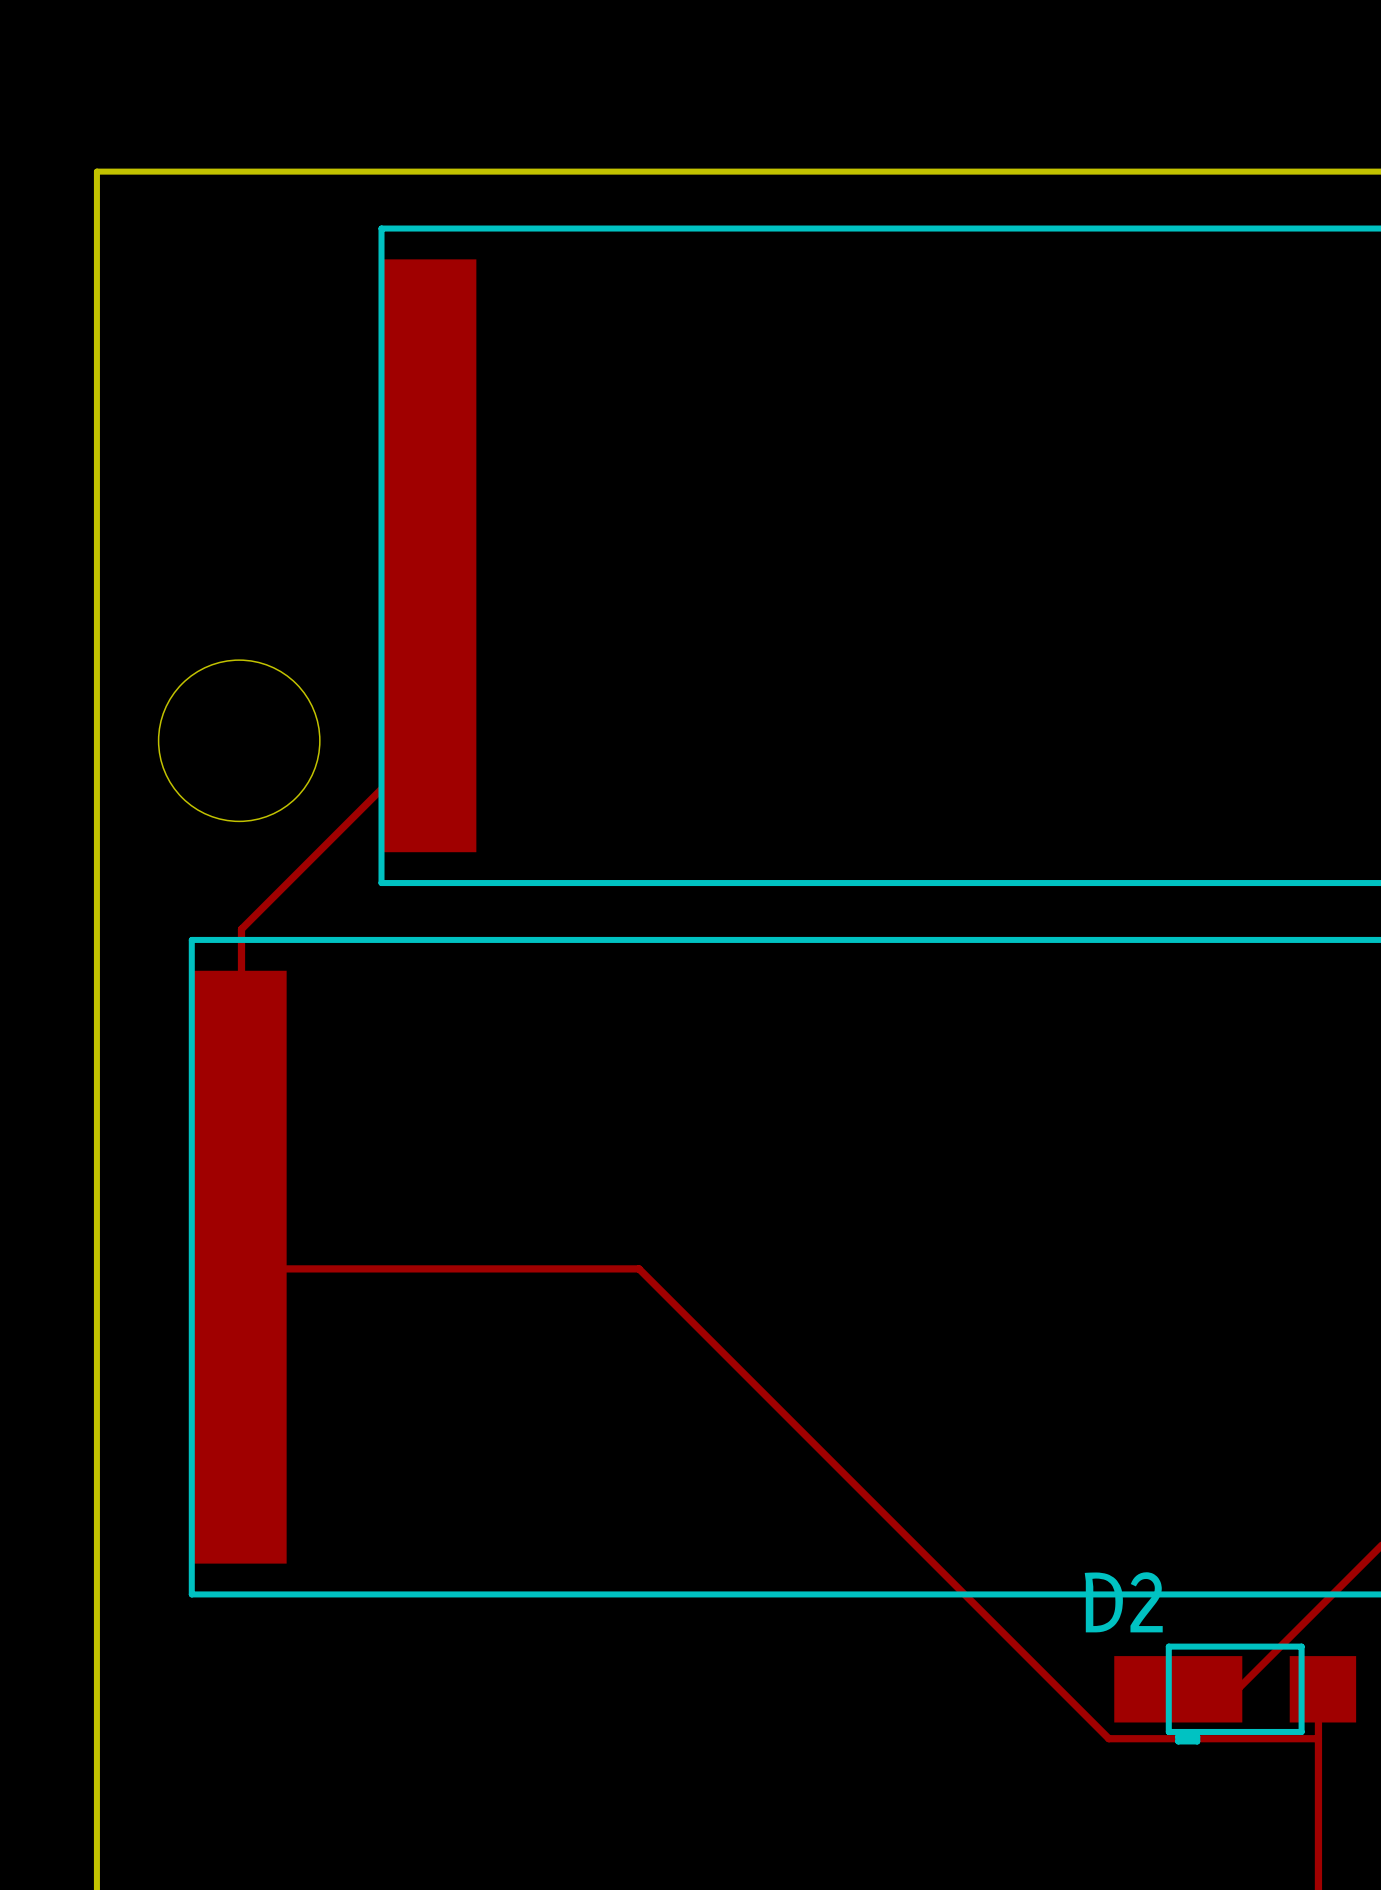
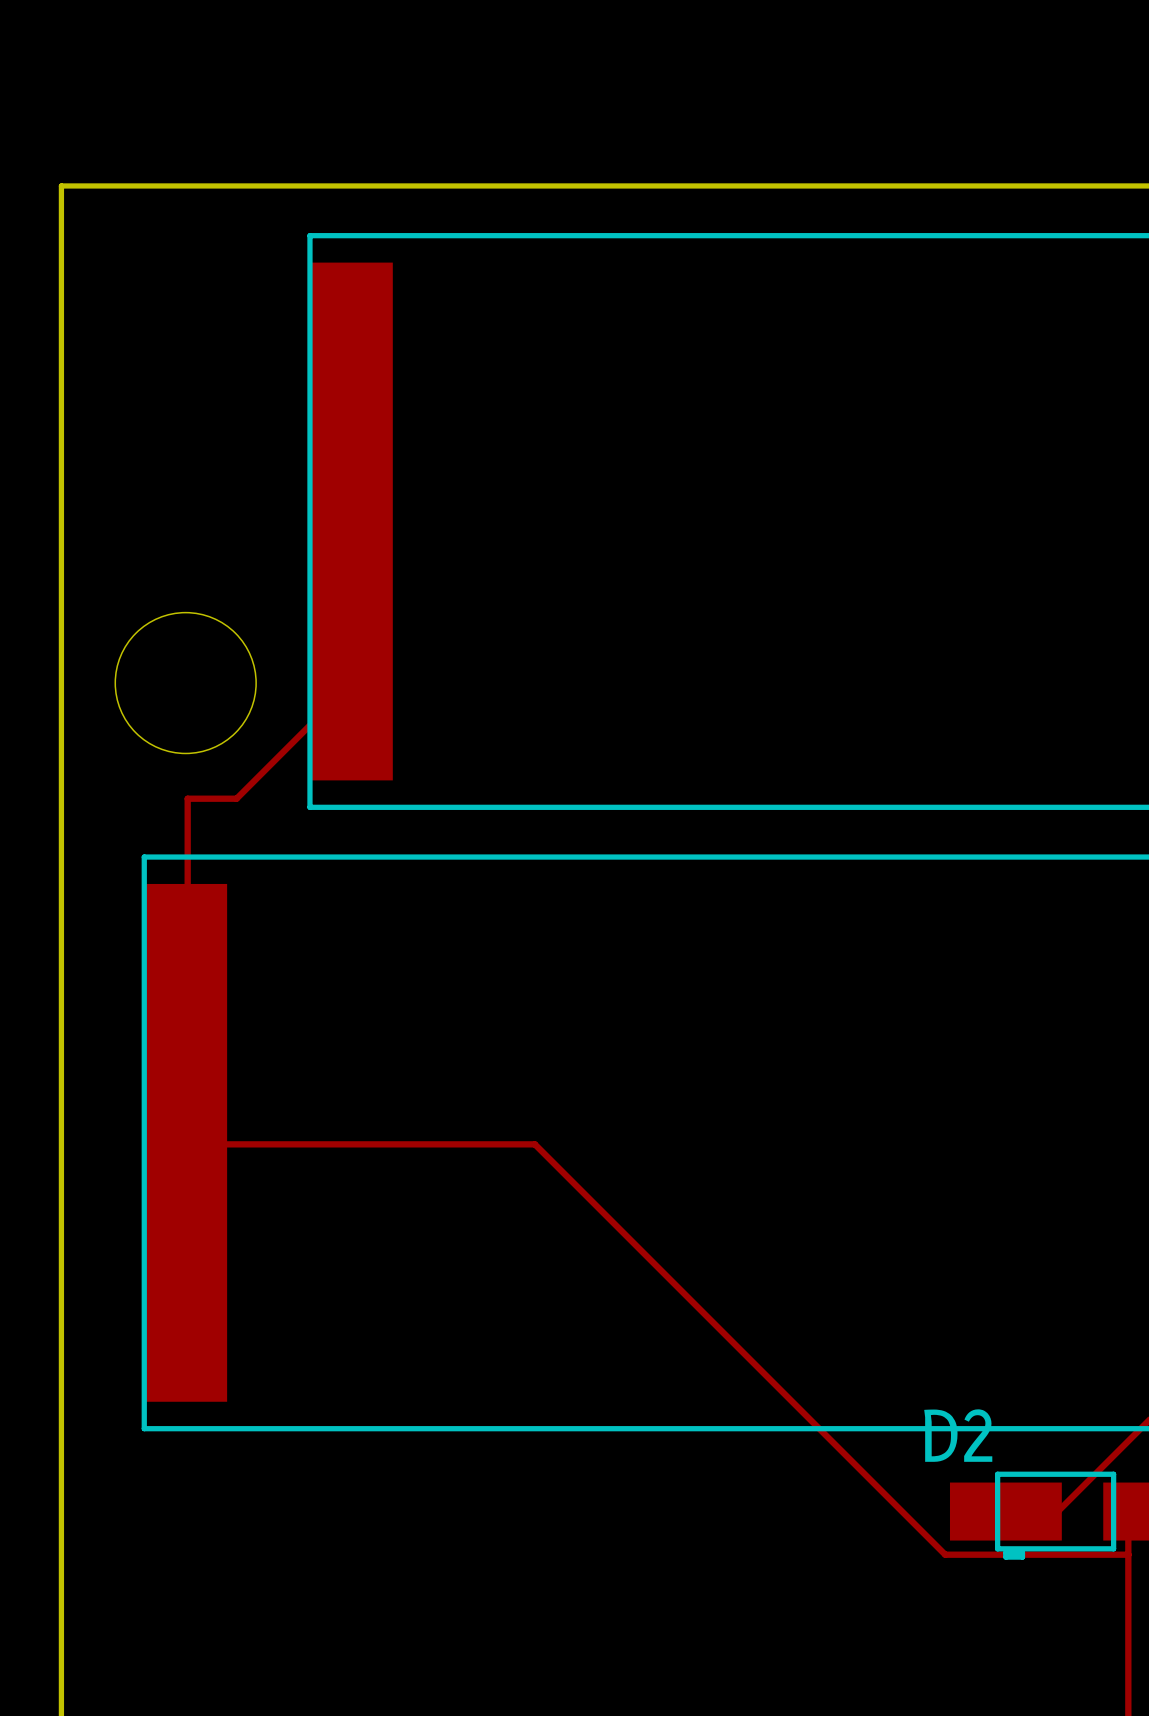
track: (297, 873) (241, 929) -> (236, 798) (187, 798) (187, 847)

